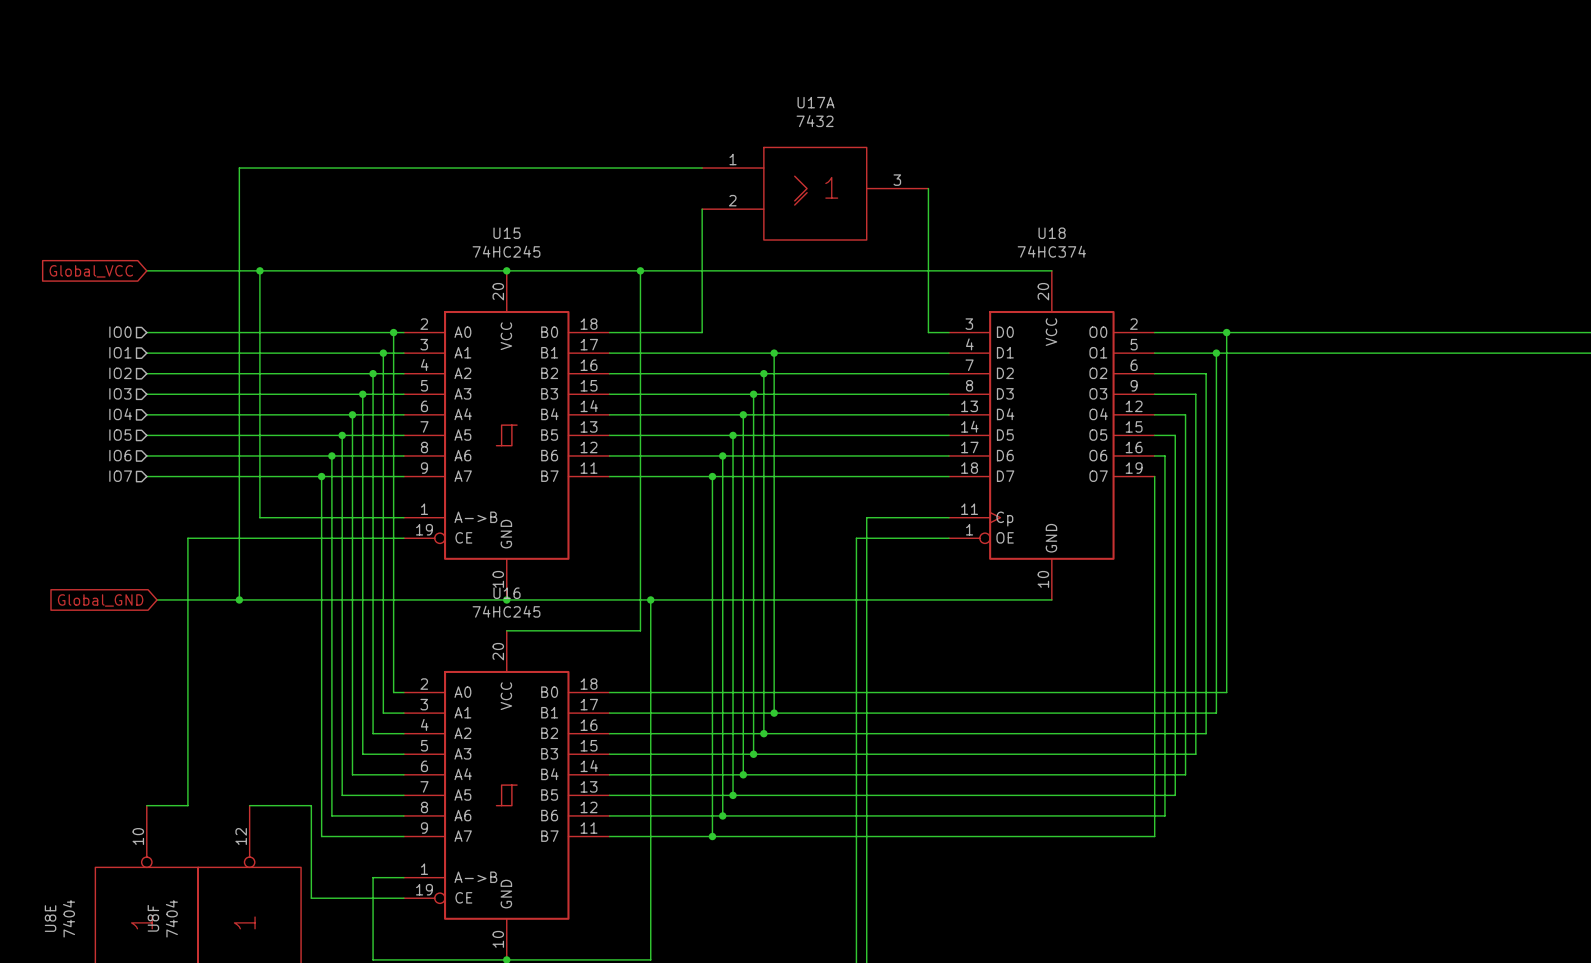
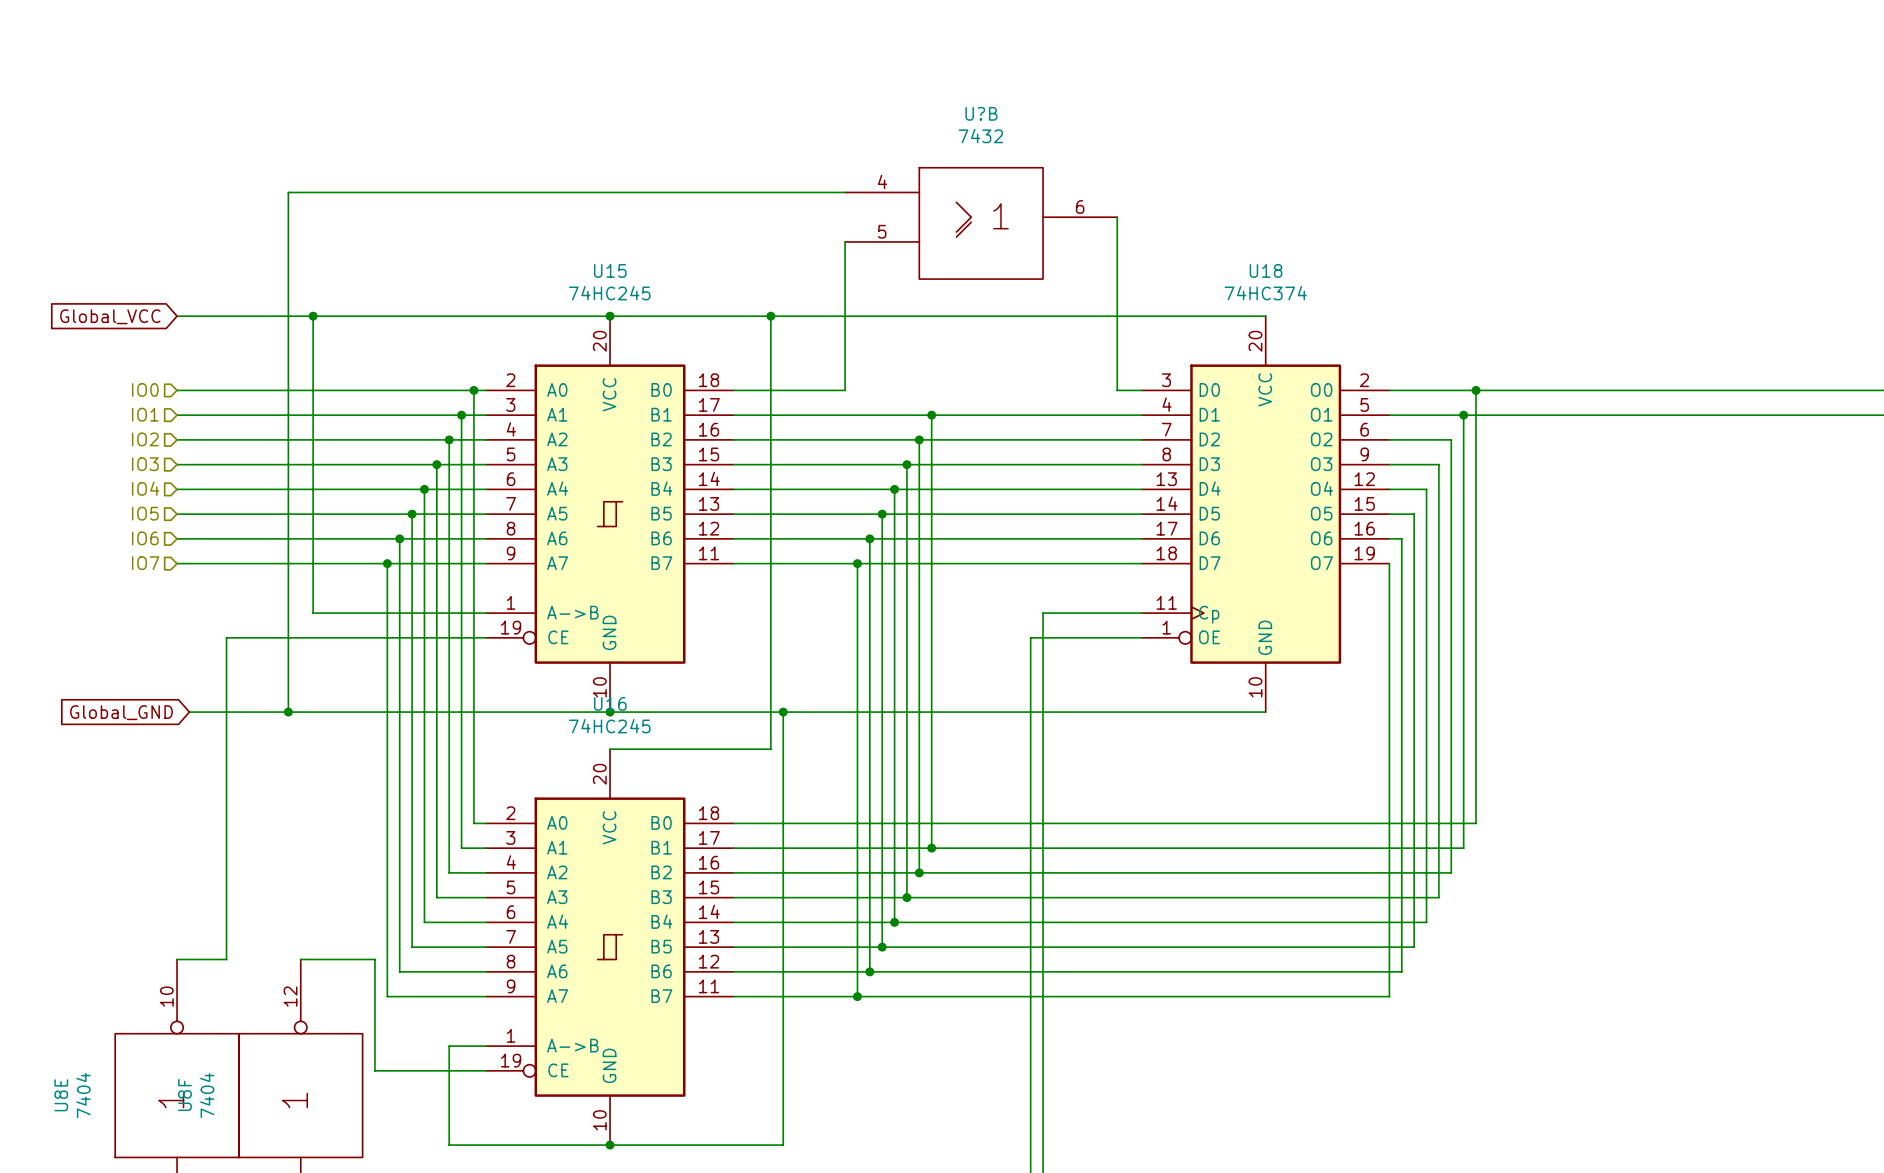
U17A name: U17A (816, 102) -> U?B (981, 113)
U17A pin number: 1 (733, 159) -> 4 (882, 181)
U17A pin number: 3 (897, 180) -> 6 (1080, 207)
U17A pin number: 2 (732, 200) -> 5 (882, 231)

